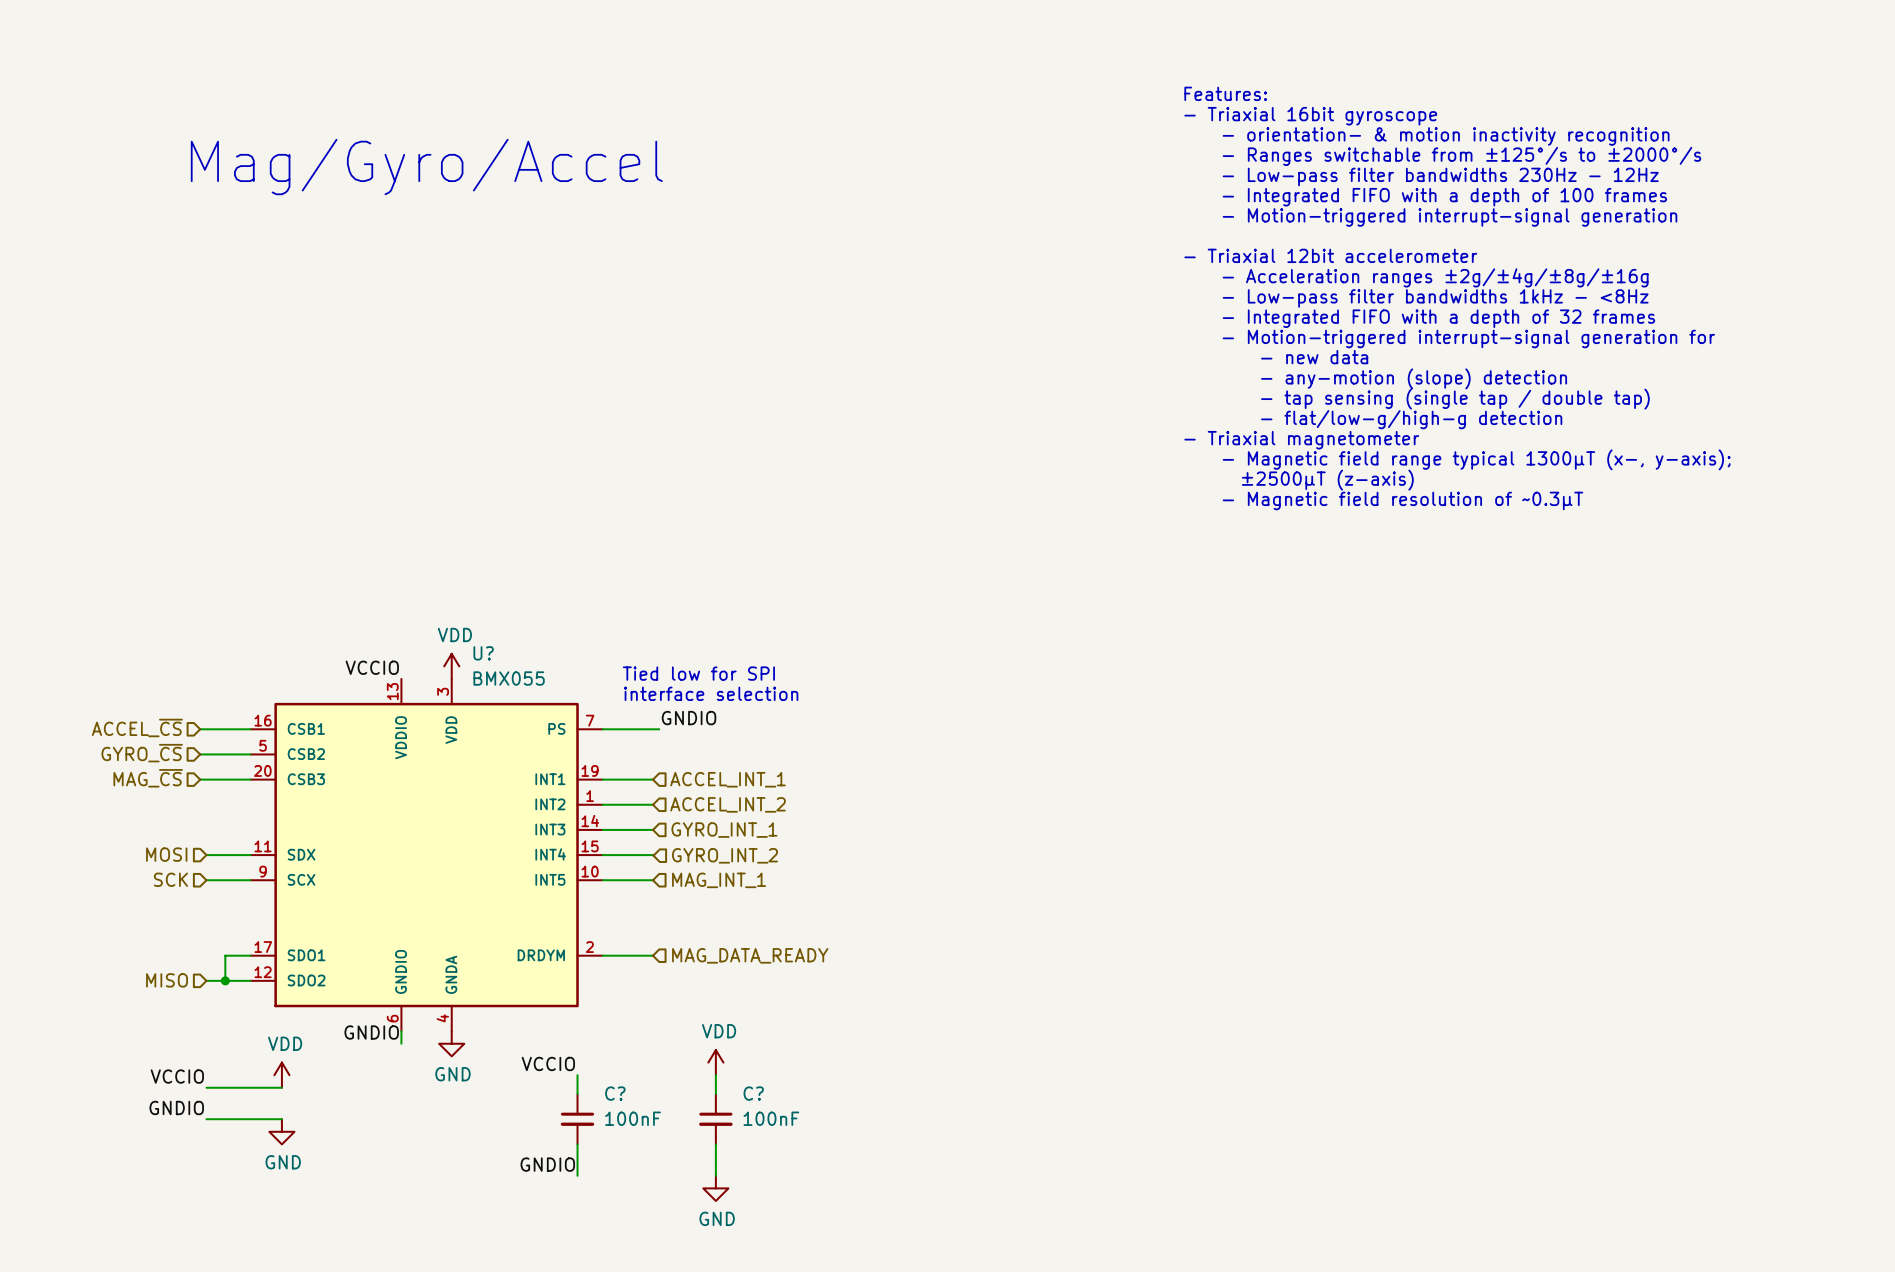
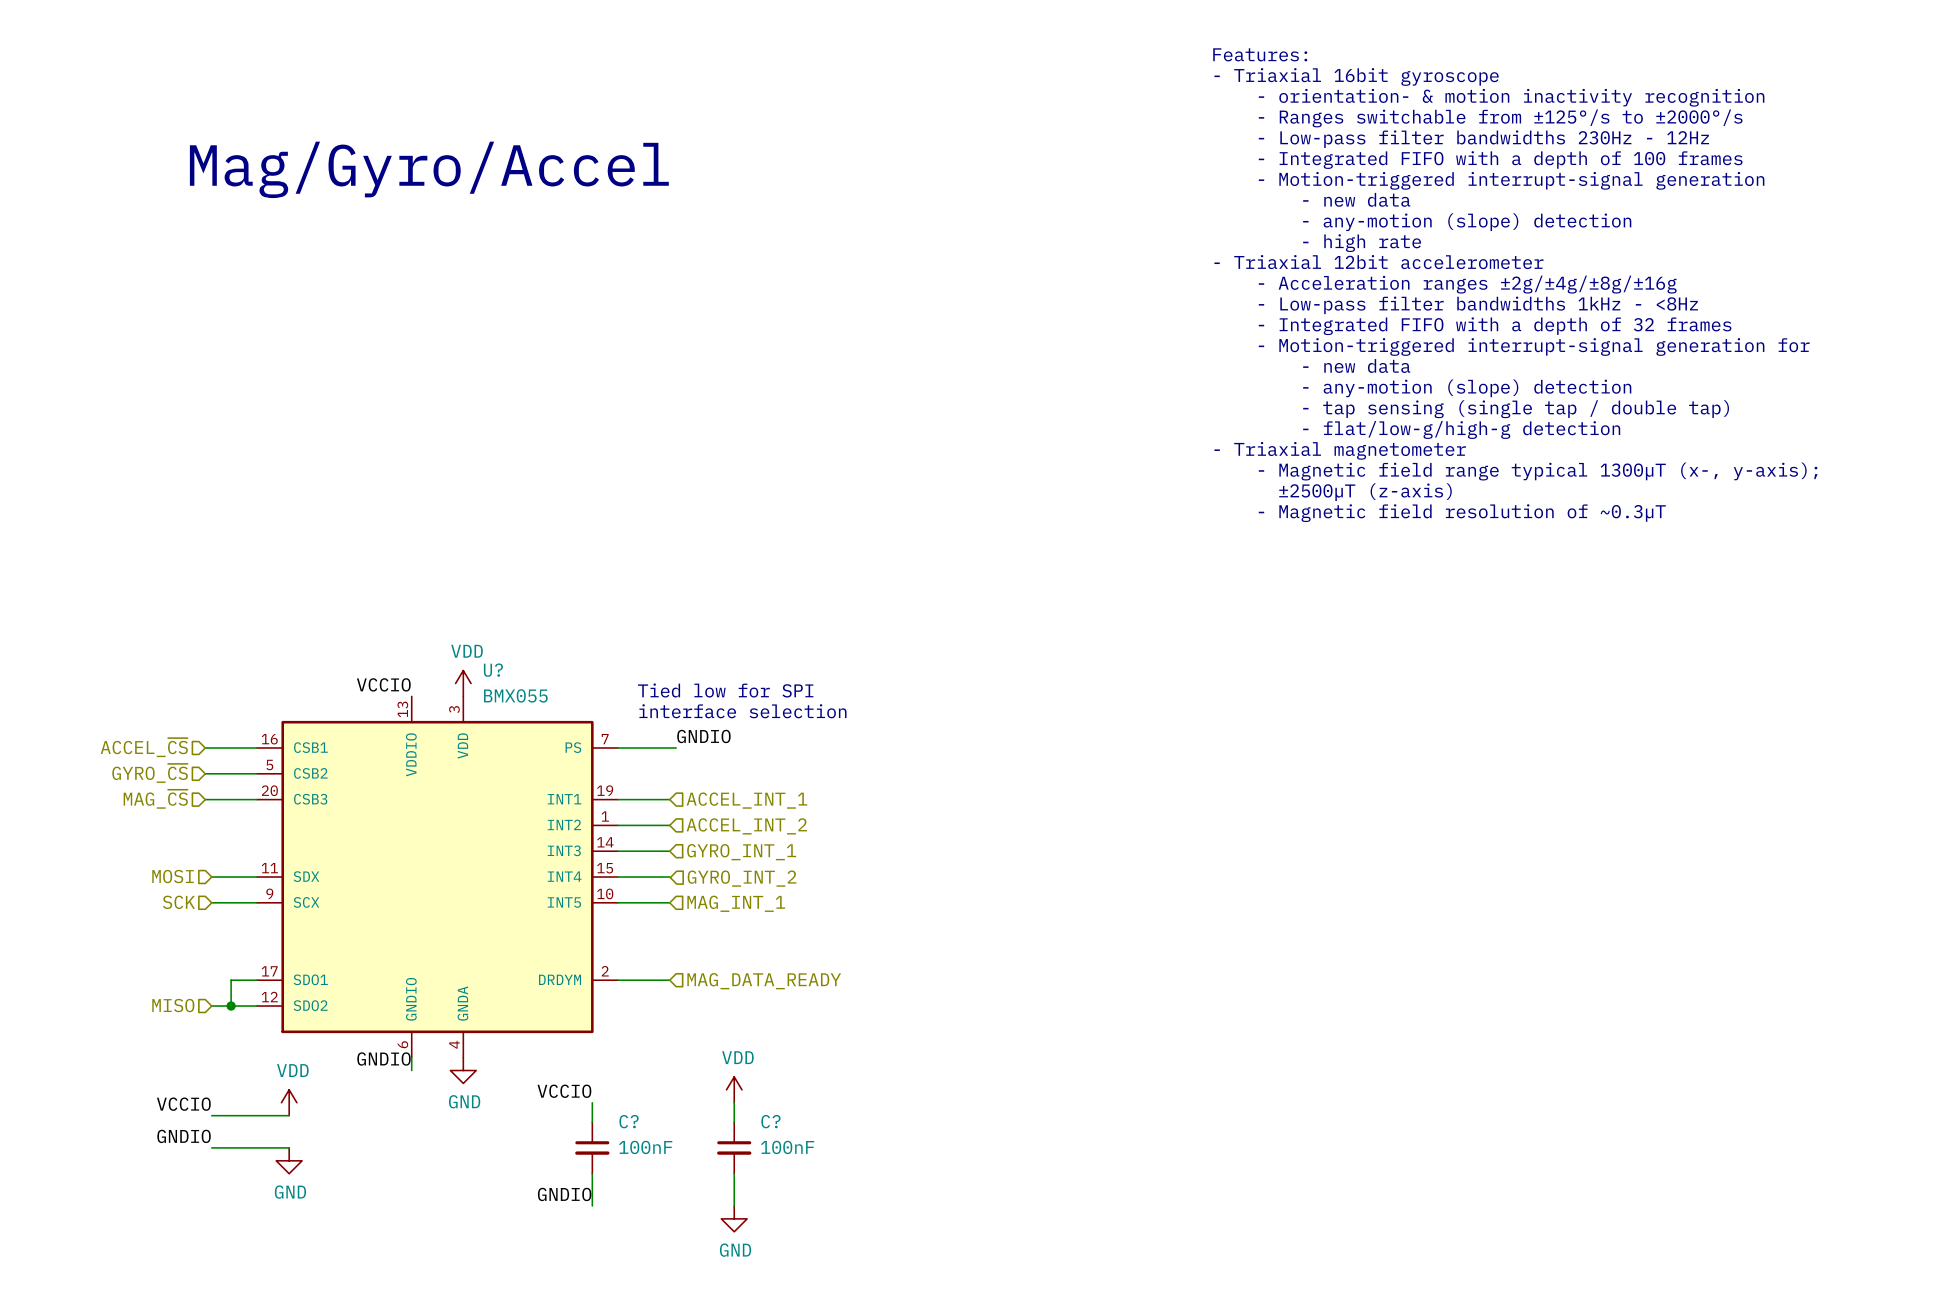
text: none -> Features: (1260, 54)
text: none -> - Triaxial 16bit gyroscope (1356, 76)
text: Features: (1225, 93) -> - orientation- & motion inactivity recognition (1511, 97)
text: - Triaxial 16bit gyroscope (1310, 116) -> - Ranges switchable from ±125°/s to ±2000°/s (1500, 118)
text: - orientation- & motion inactivity recognition (1446, 136) -> - Low-pass filter bandwidths 230Hz - 12Hz (1483, 139)
text: - Ranges switchable from ±125°/s to ±2000°/s (1461, 156) -> - Integrated FIFO with a depth of 100 frames (1500, 160)
text: - Low-pass filter bandwidths 230Hz - 12Hz (1440, 176) -> - Motion-triggered interrupt-signal generation (1511, 180)
text: - Integrated FIFO with a depth of 100 frames (1444, 197) -> - new data (1356, 199)
text: - Motion-triggered interrupt-signal generation (1449, 217) -> - any-motion (slope) detection (1467, 222)
text: none -> - high rate (1362, 243)

